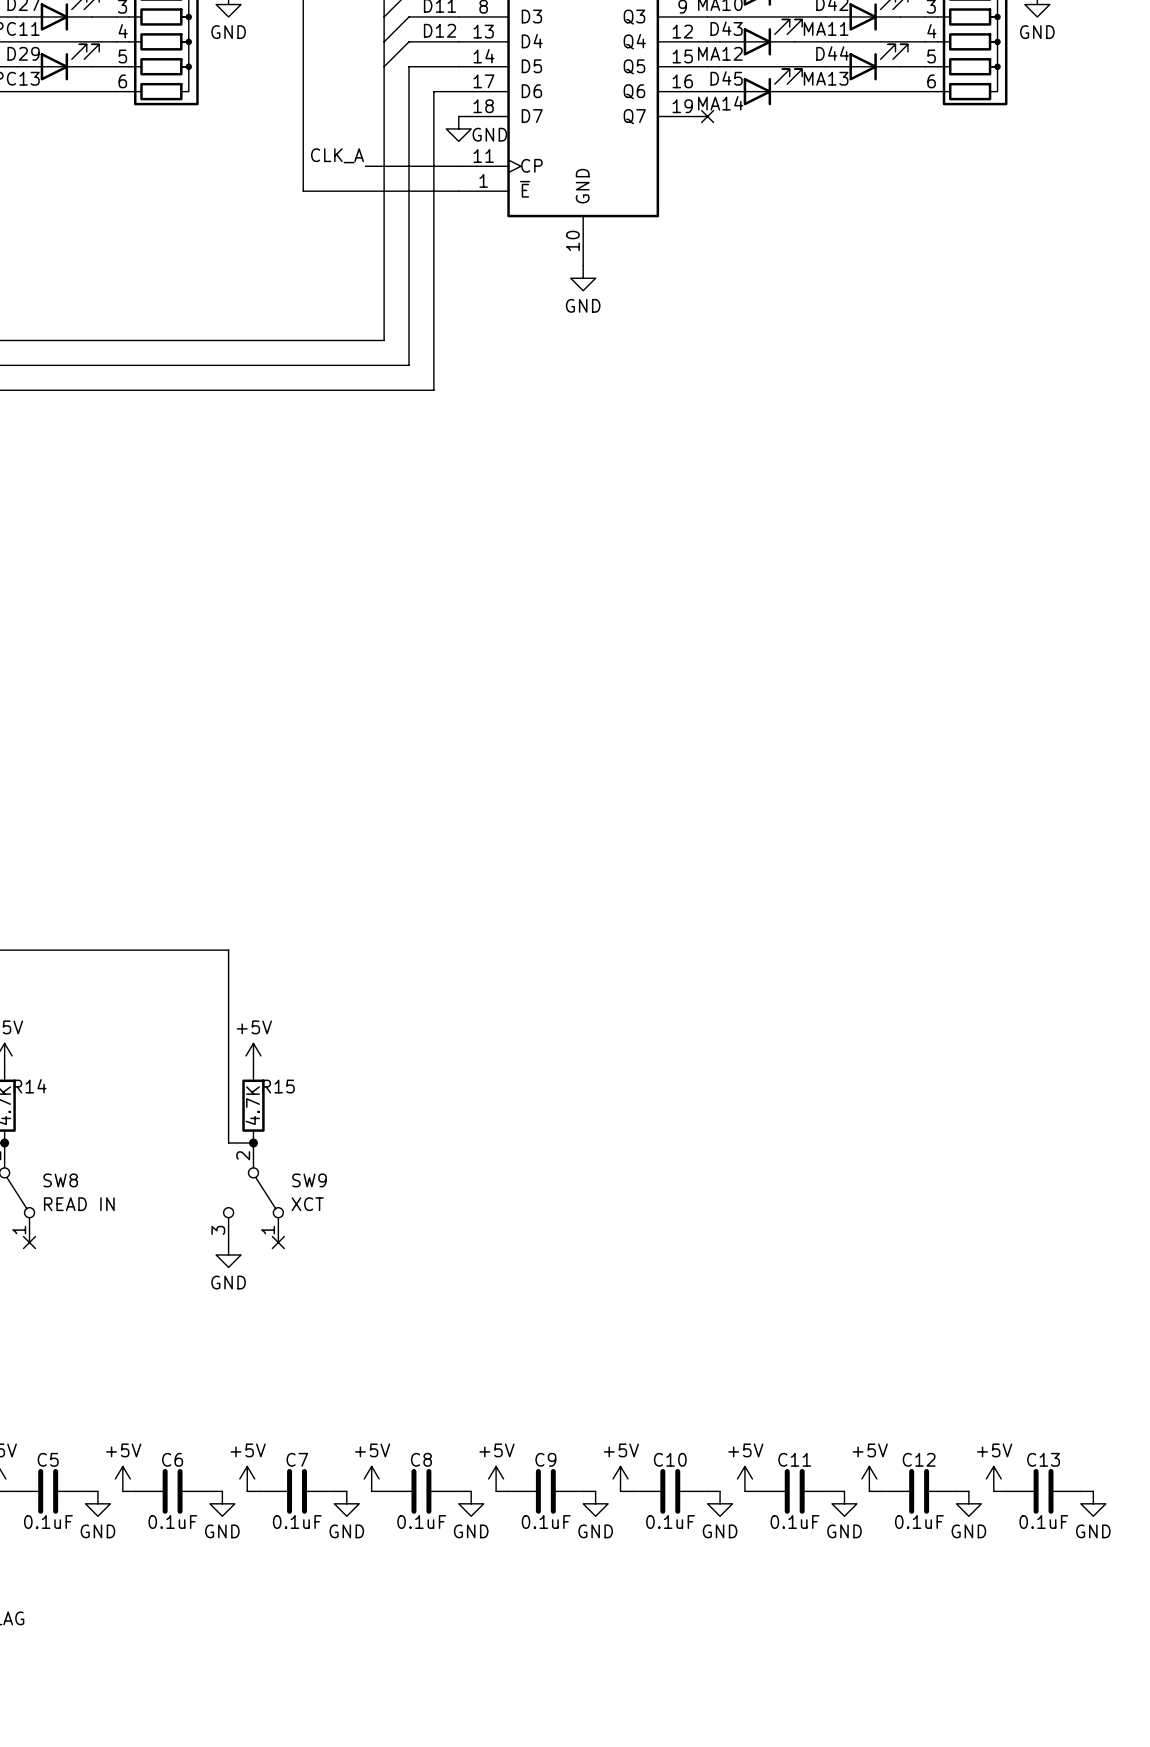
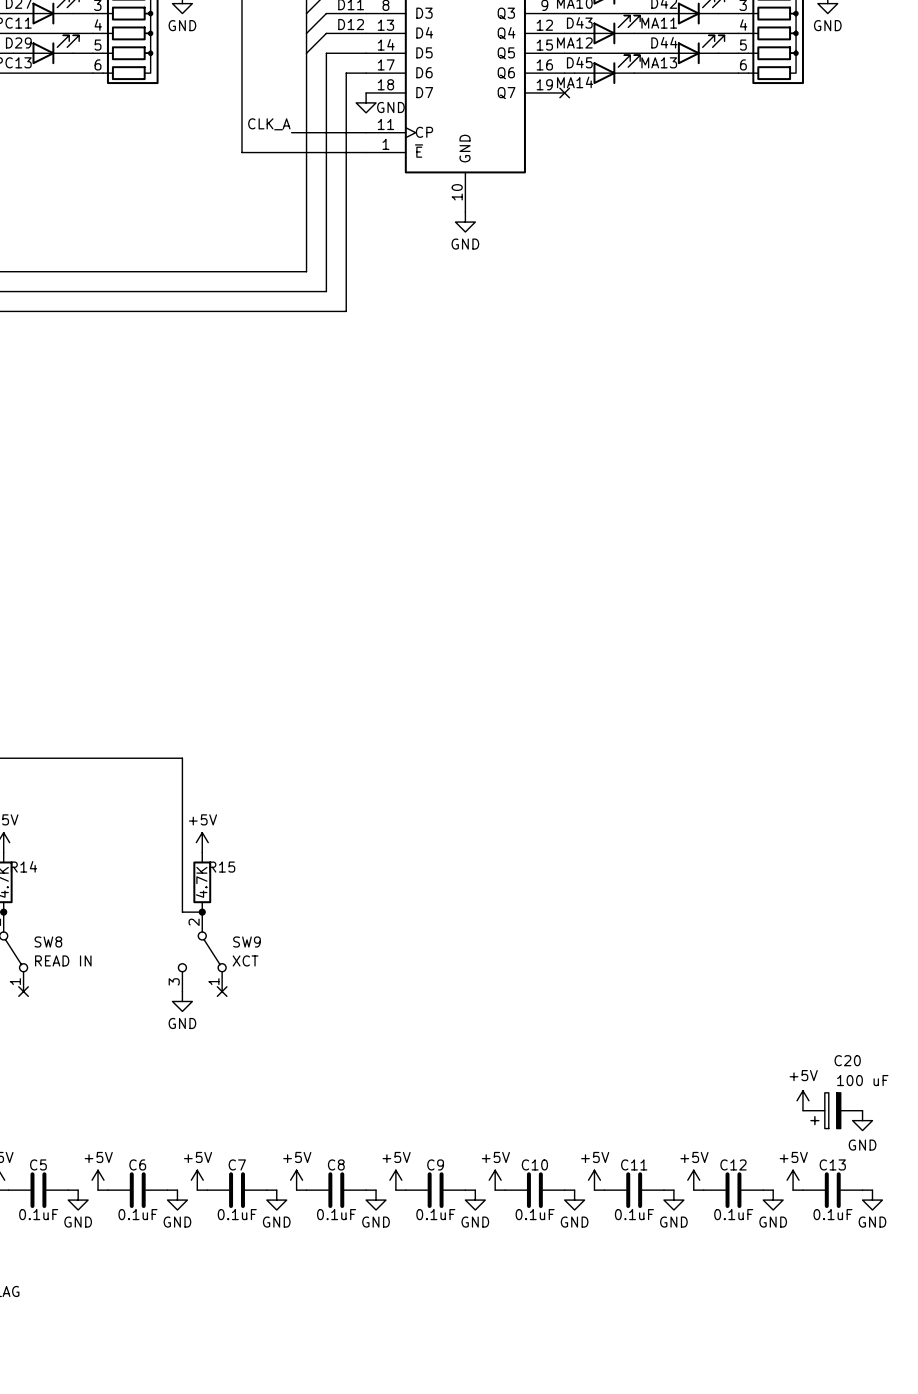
power symbol: none -> +5V (802, 1100)
C20: none -> 100 uF (832, 1110)
power symbol: none -> GND (862, 1120)

